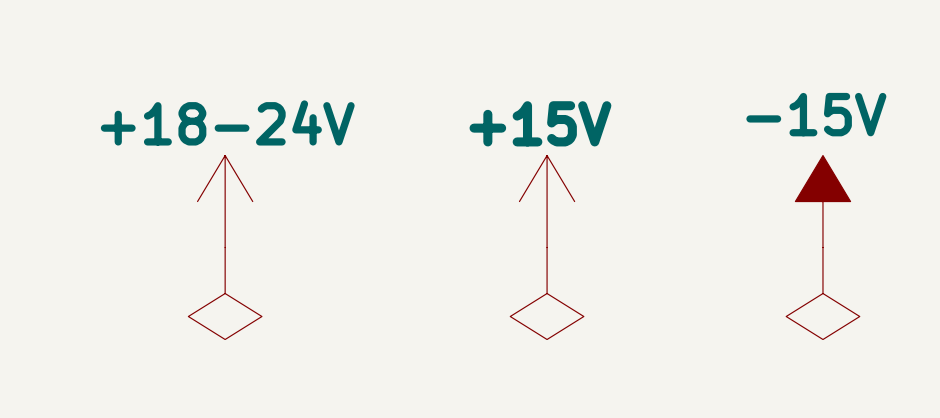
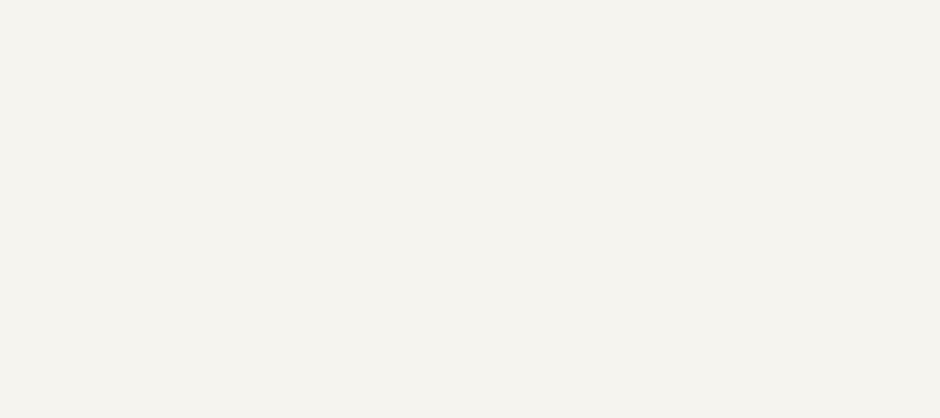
power symbol: +18-24V (225, 201) -> none
power symbol: +15V (547, 201) -> none
power symbol: -15V (822, 201) -> none
power symbol: (225, 293) -> none
power symbol: (547, 293) -> none
power symbol: (822, 293) -> none

